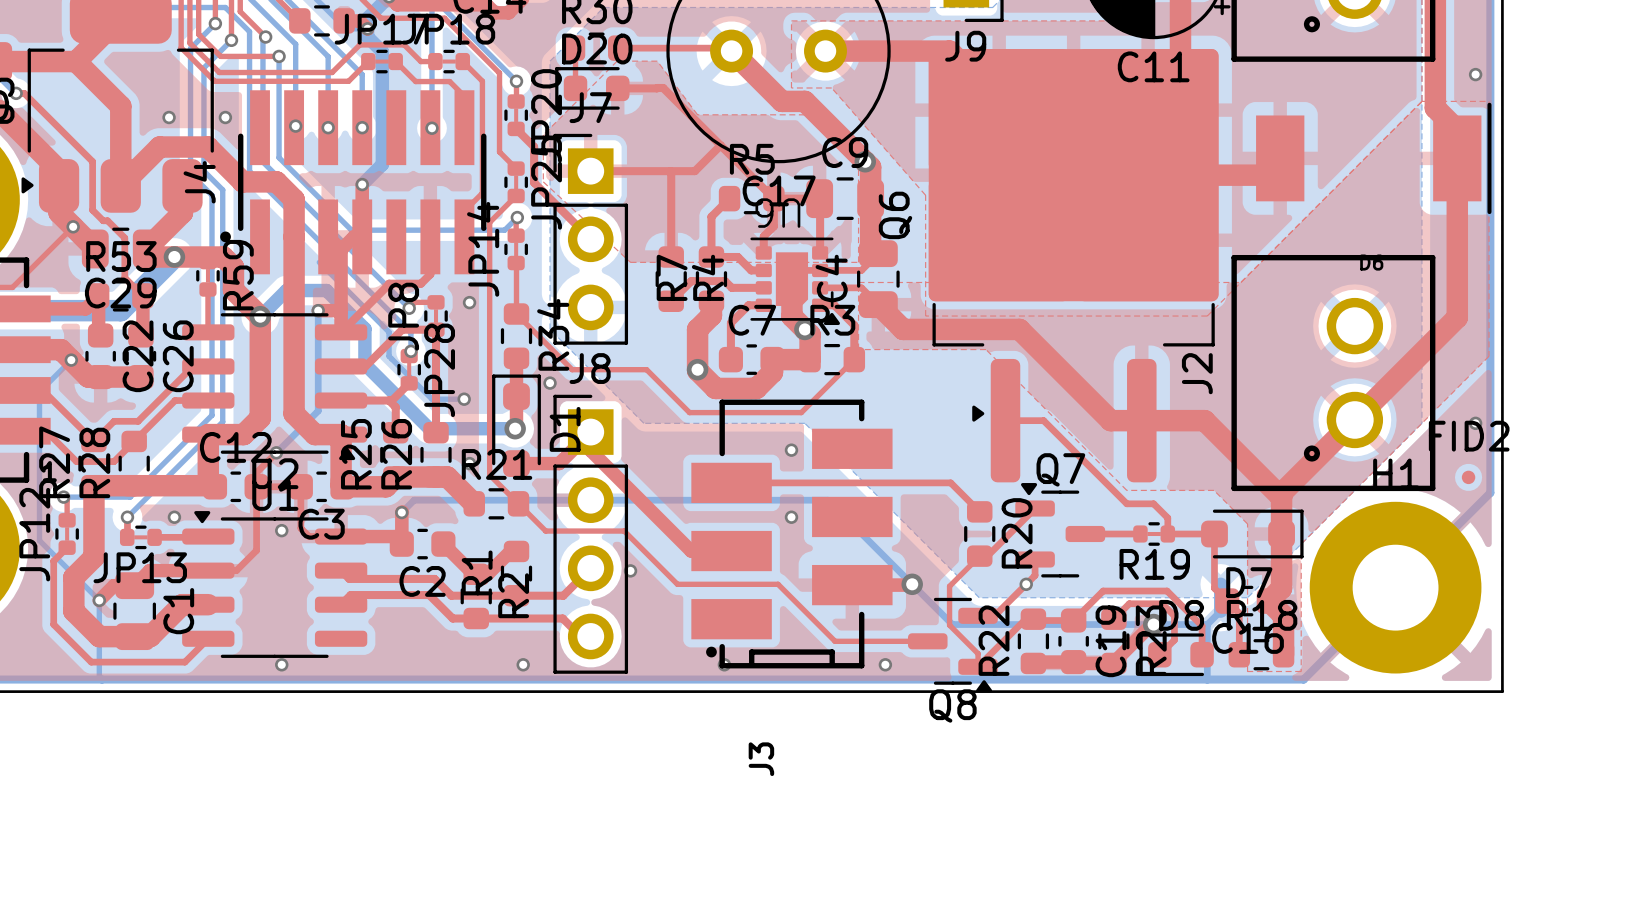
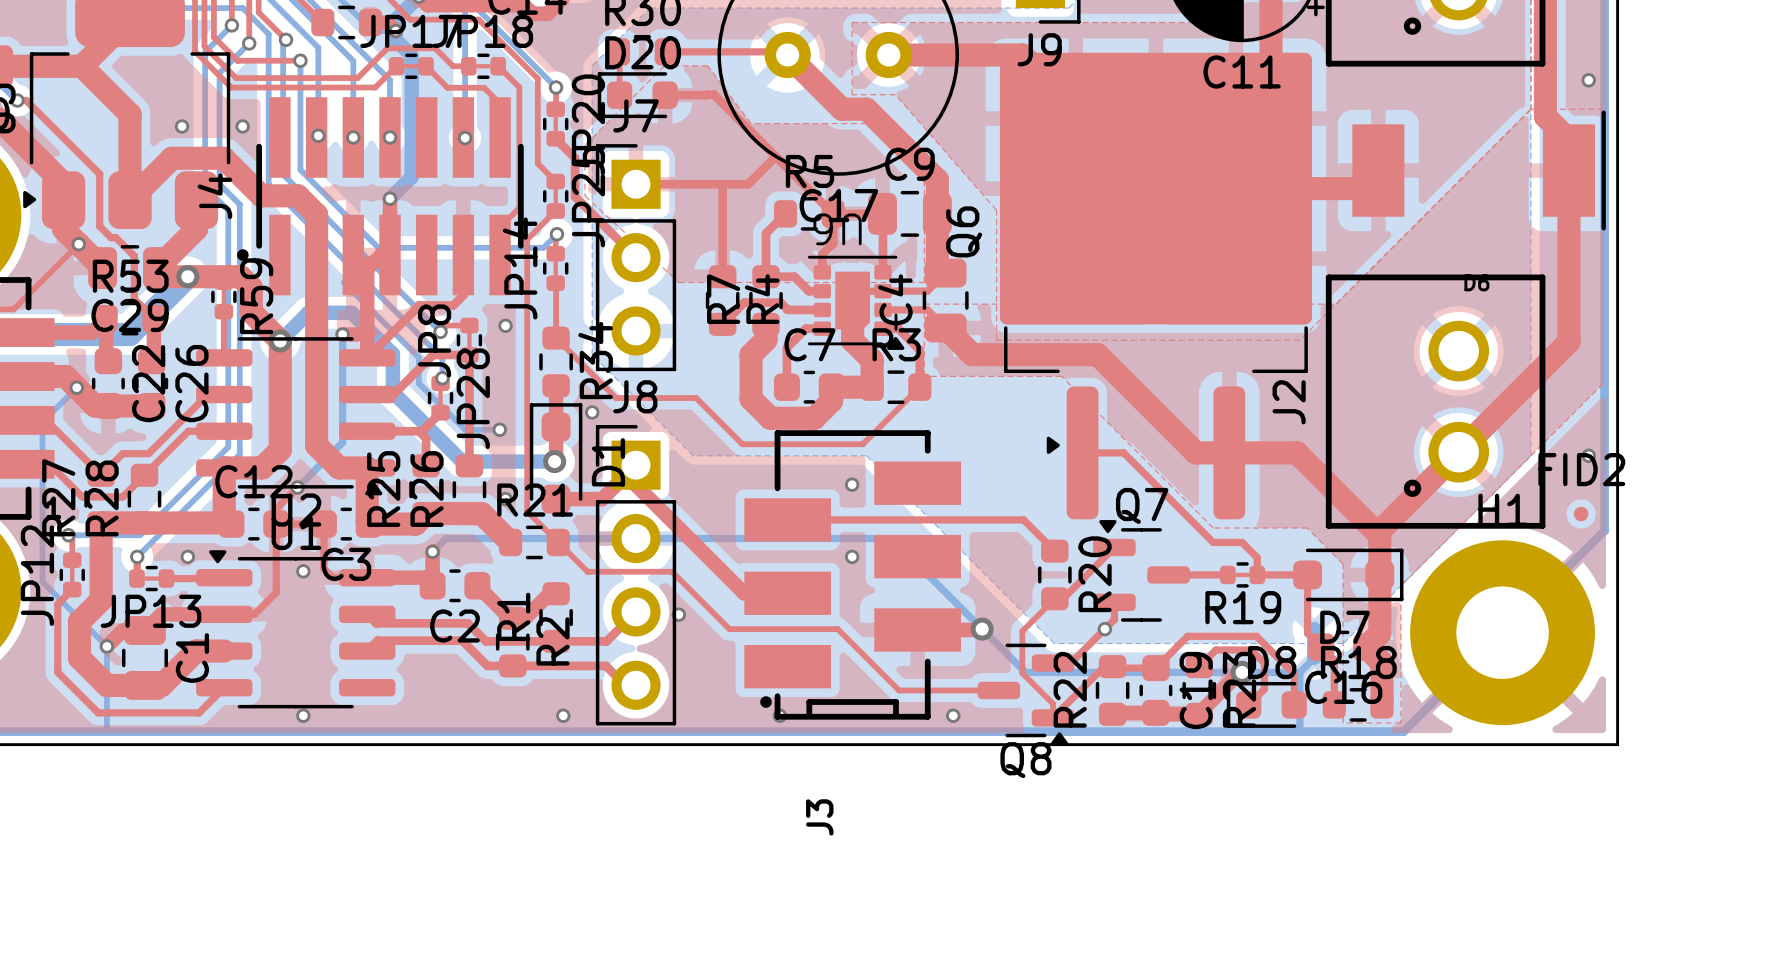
via: (865, 161) -> none
via: (804, 329) -> none
via: (697, 369) -> none

